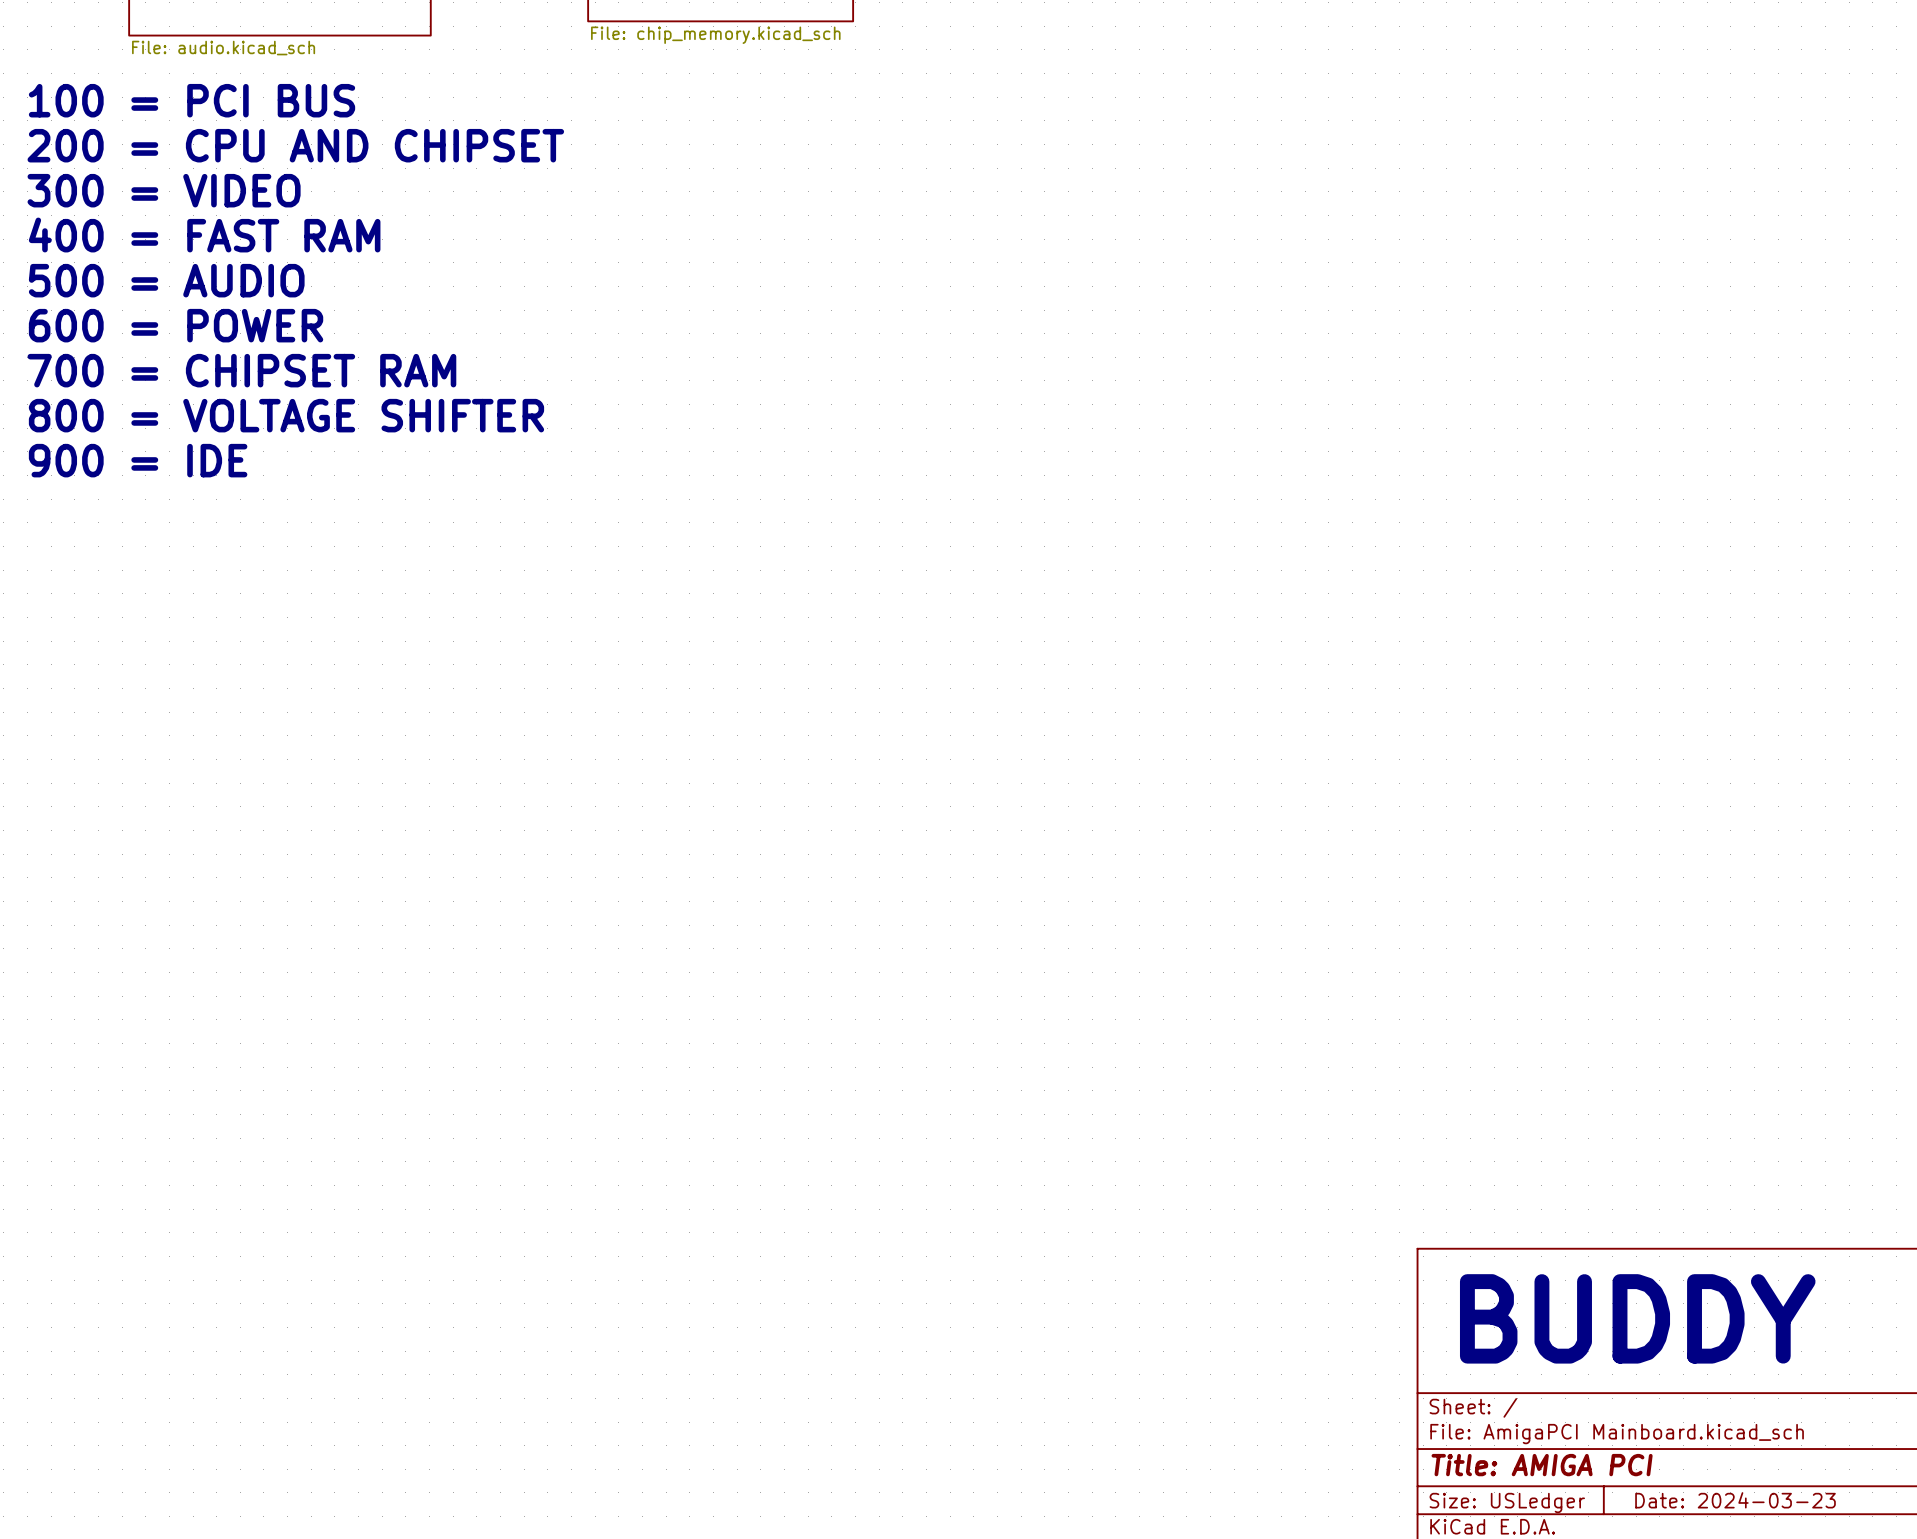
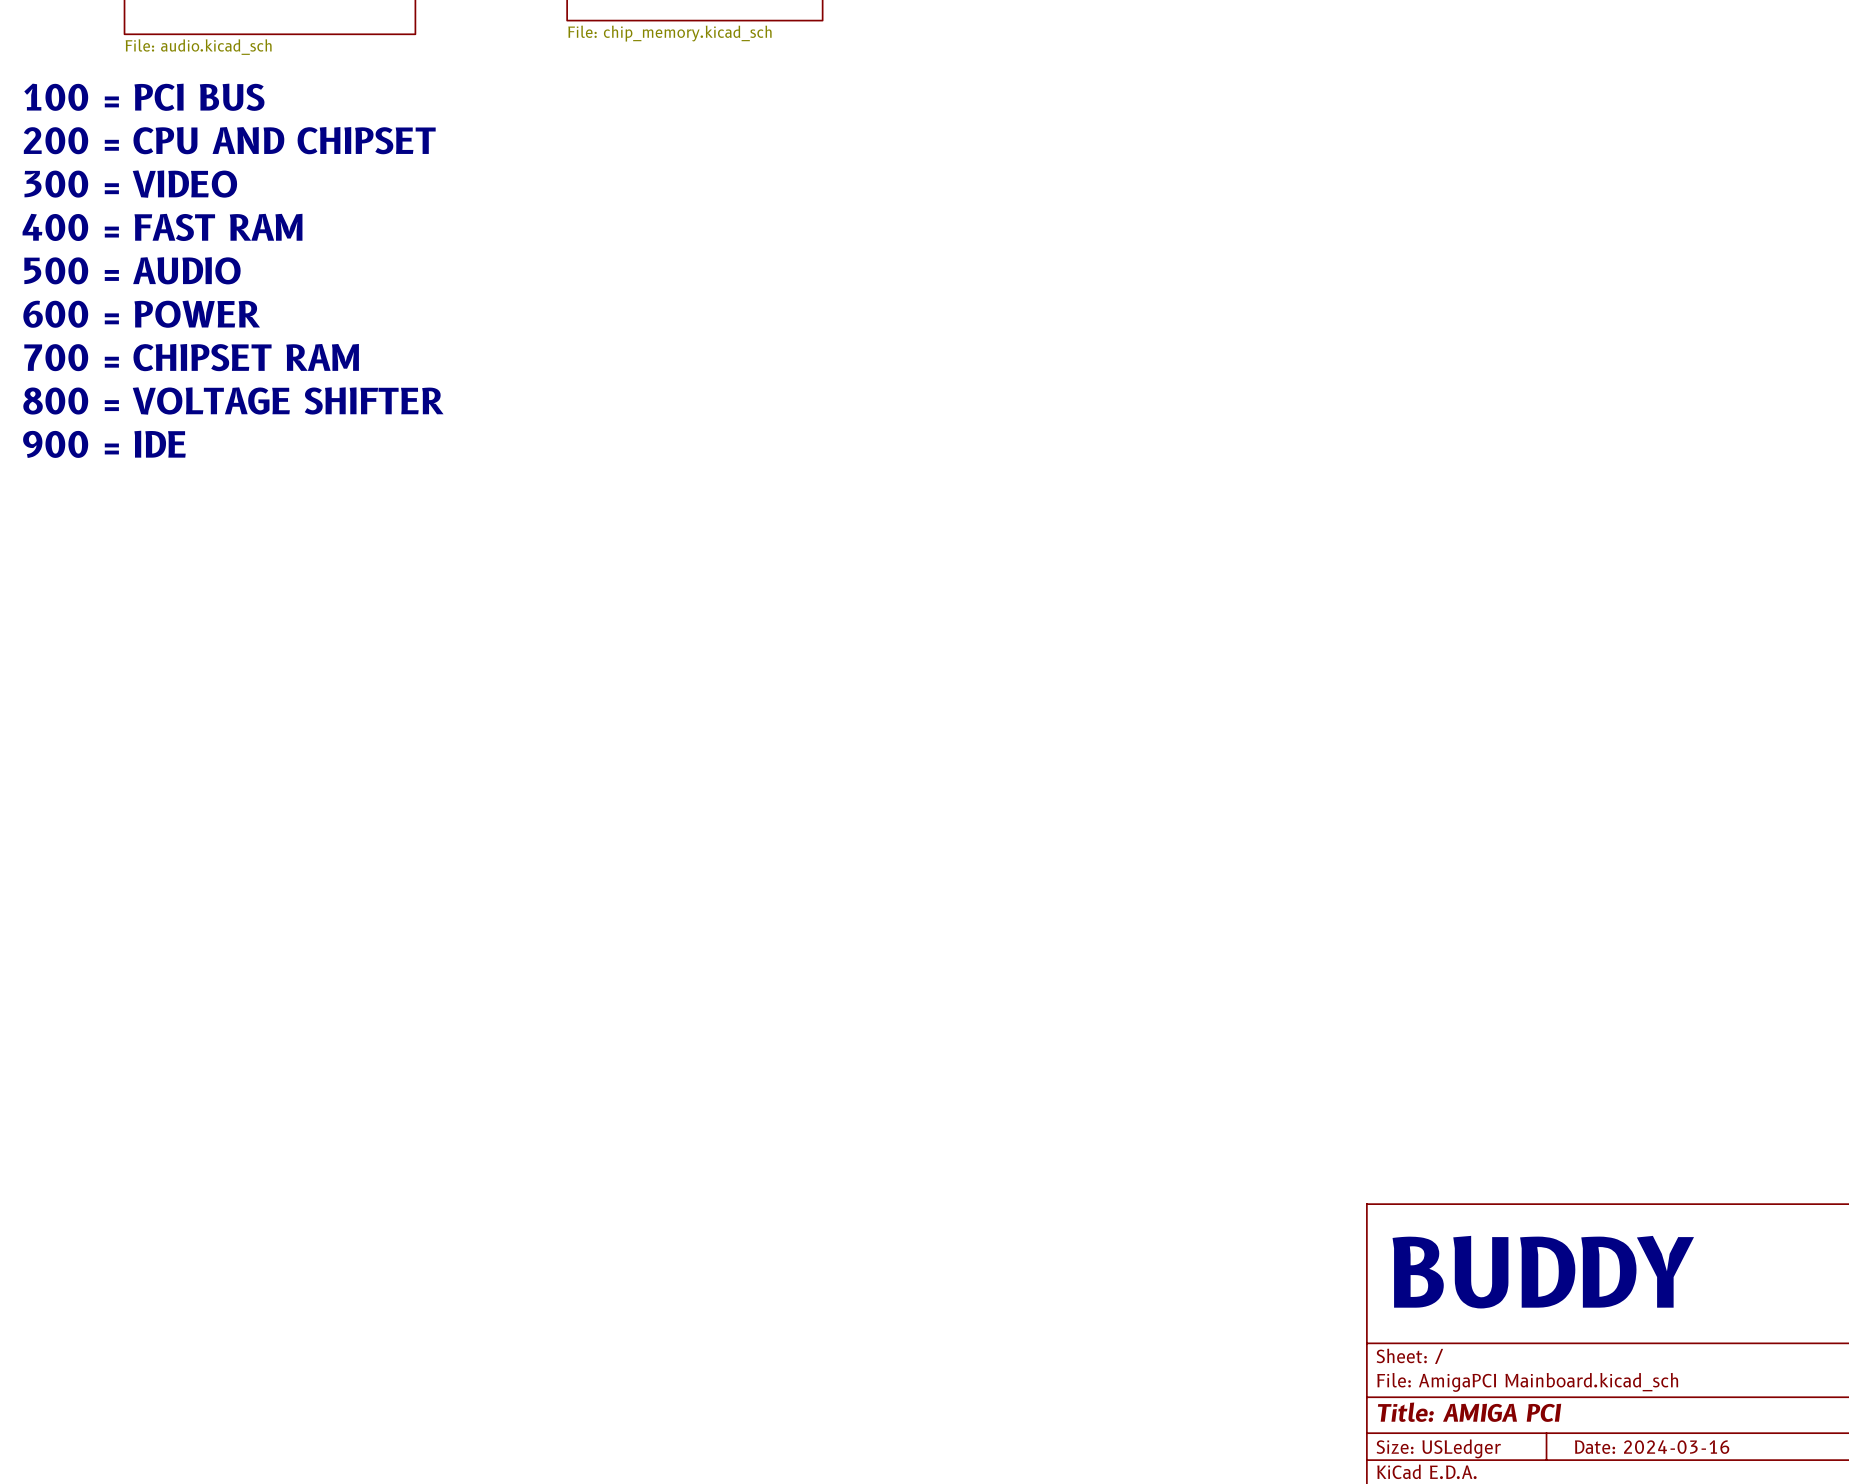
title block: Date: 2024-03-23 (1735, 1500) -> Date: 2024-03-16 (1652, 1447)

